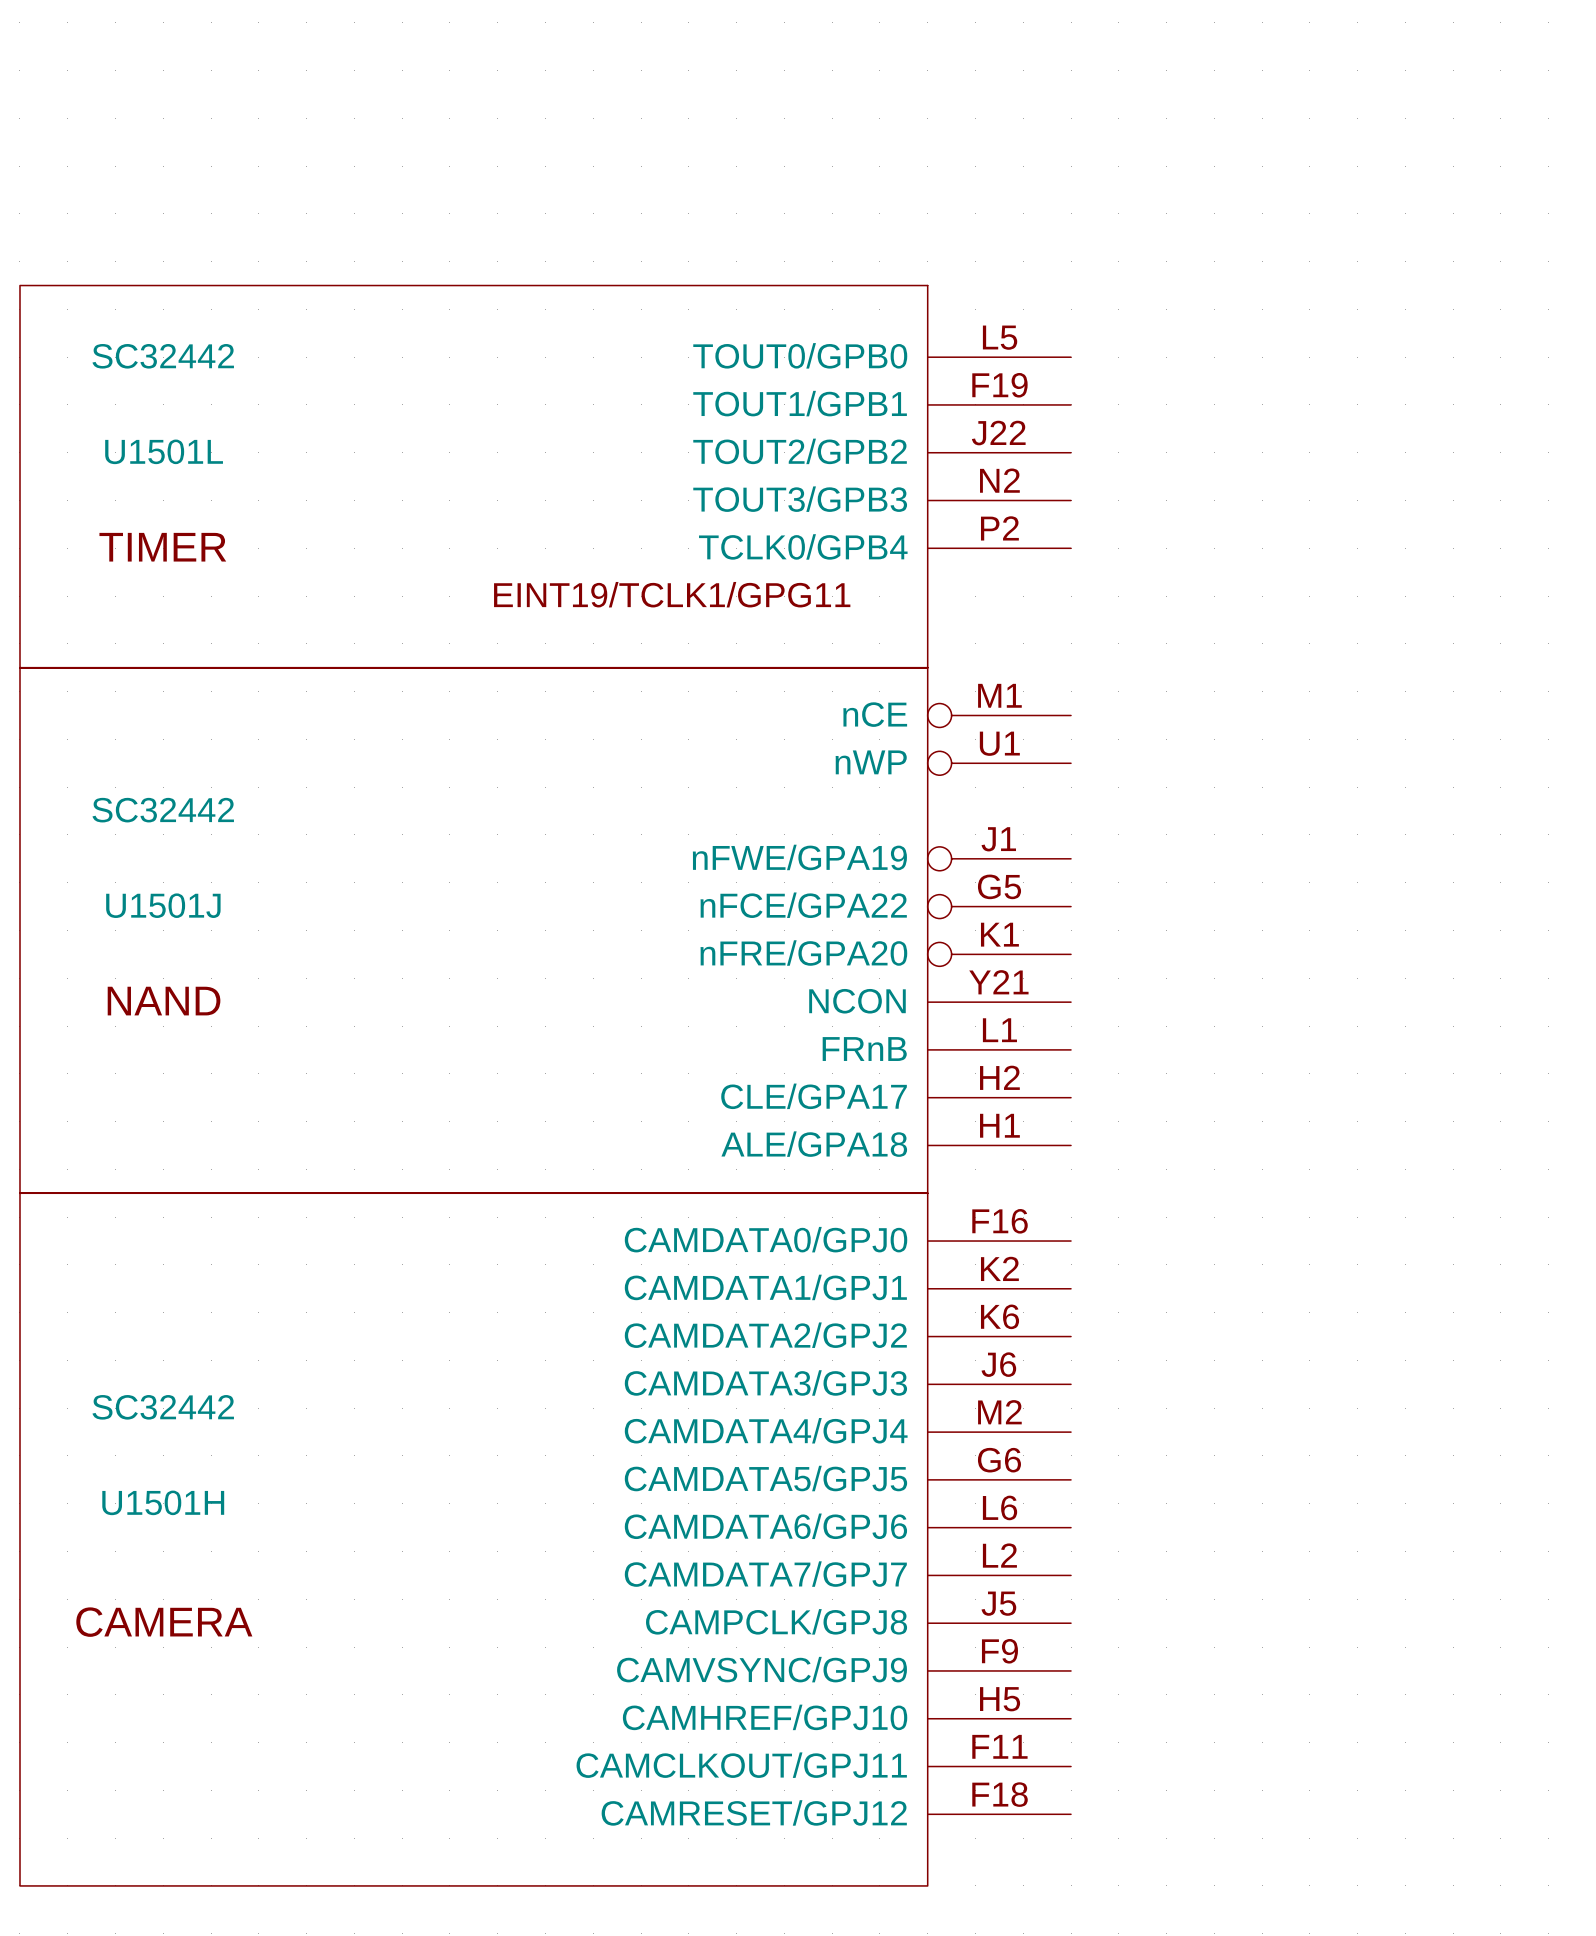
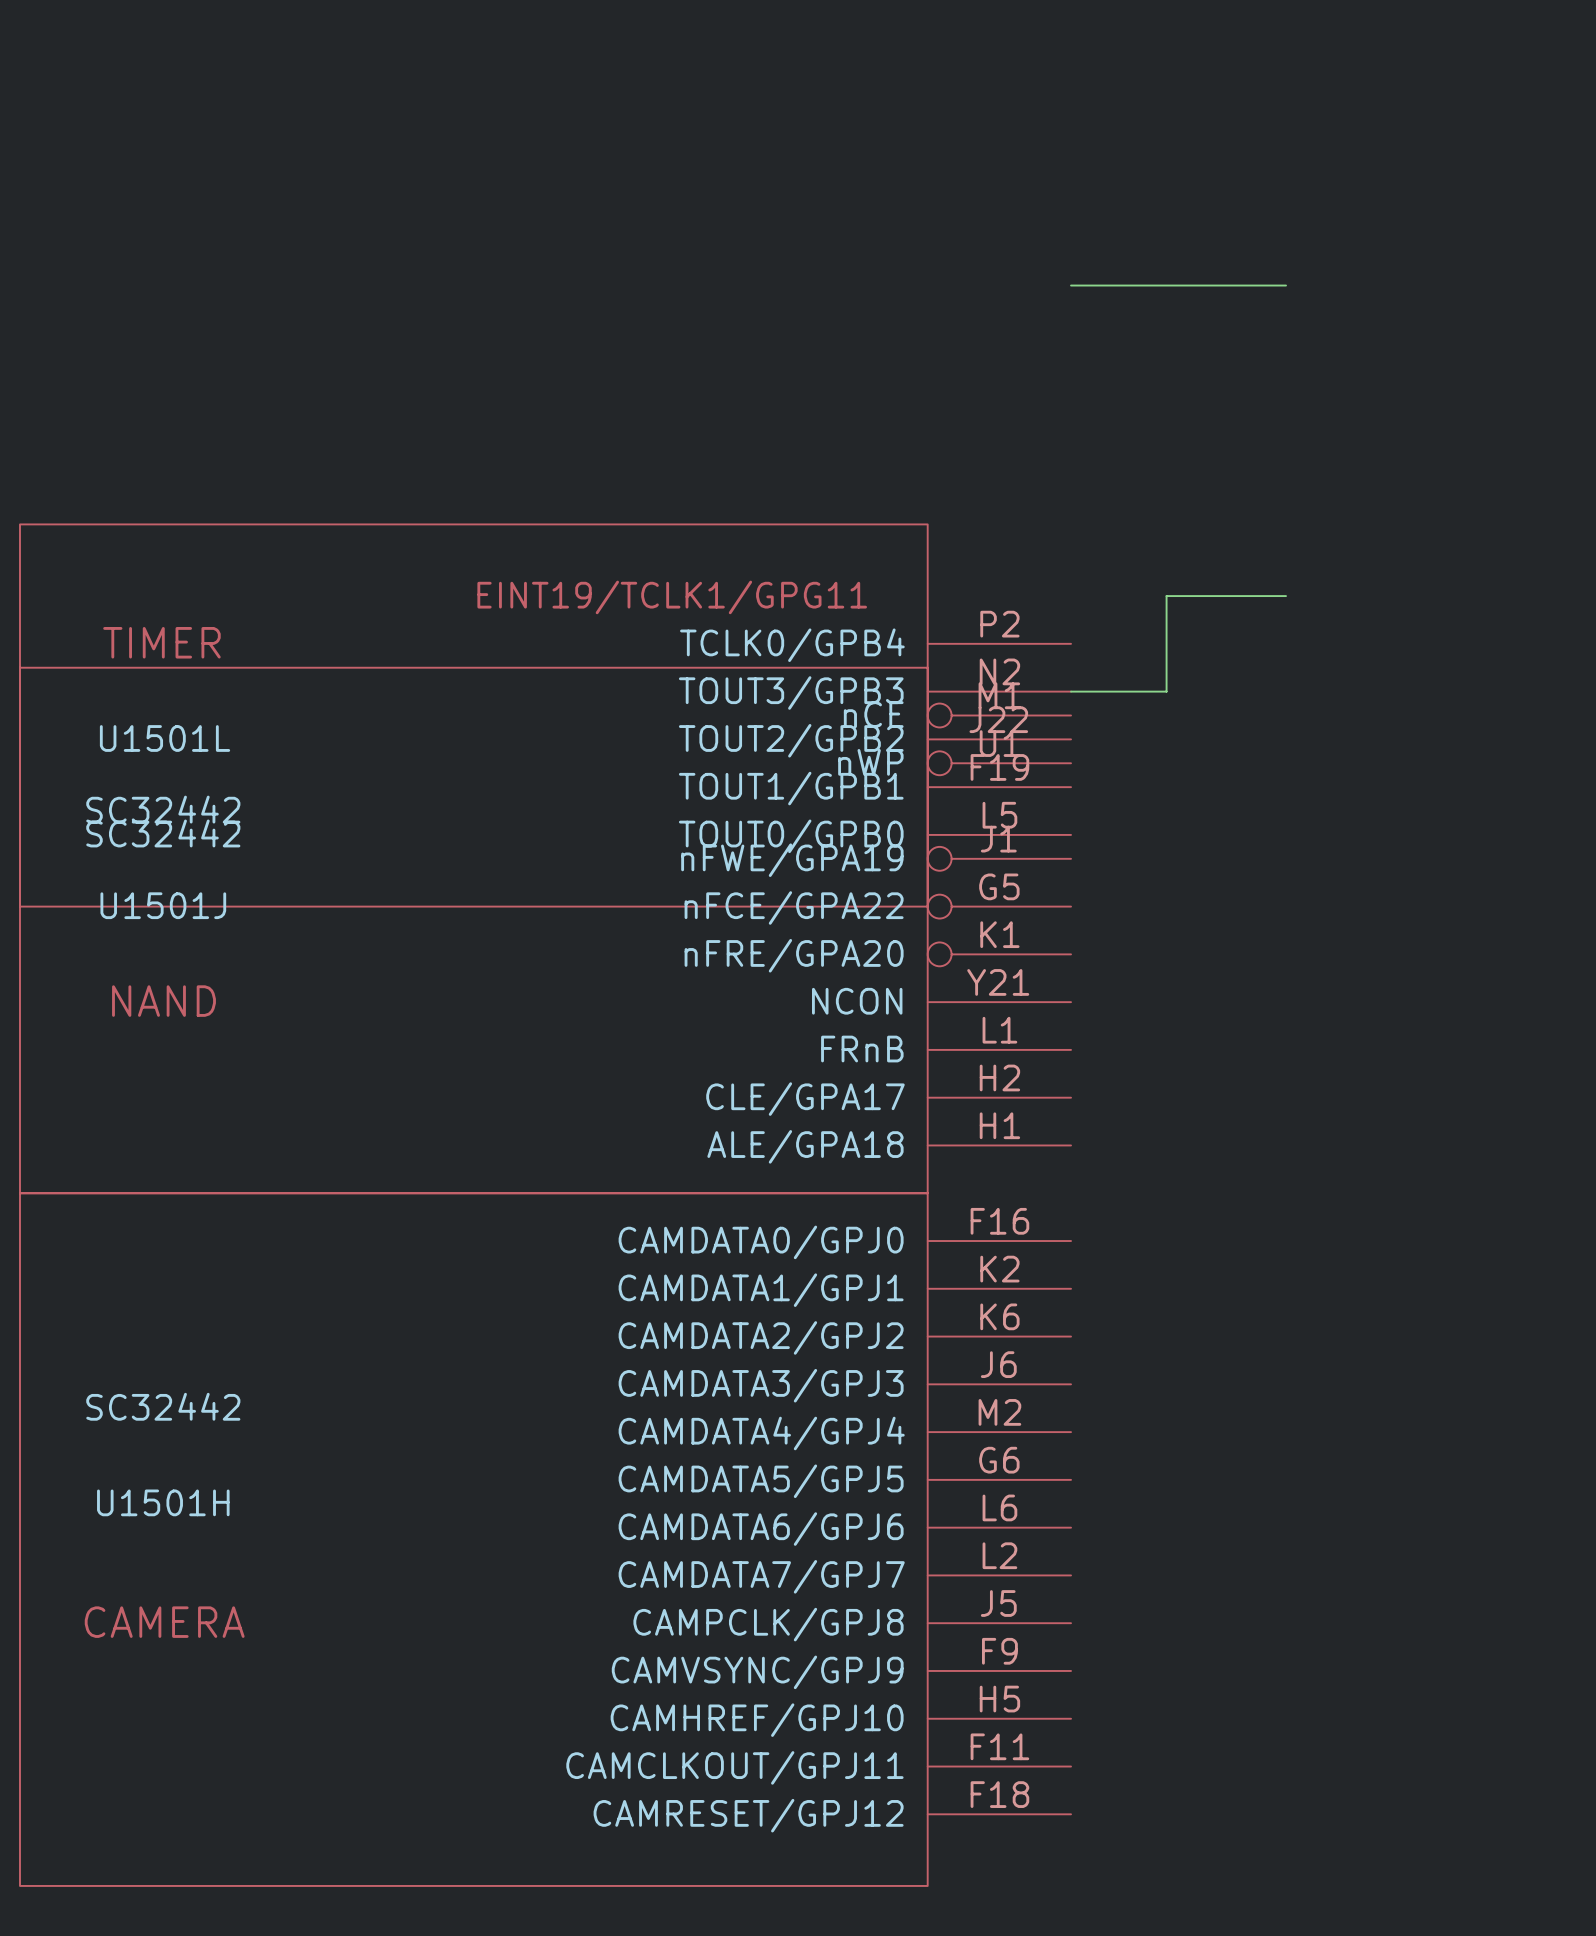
wire: none -> (1071, 285) (1286, 285)
U1501L flip: as is (473, 476) -> up-down (473, 715)
wire: none -> (1286, 596) (1166, 596) (1166, 691) (1071, 691)

